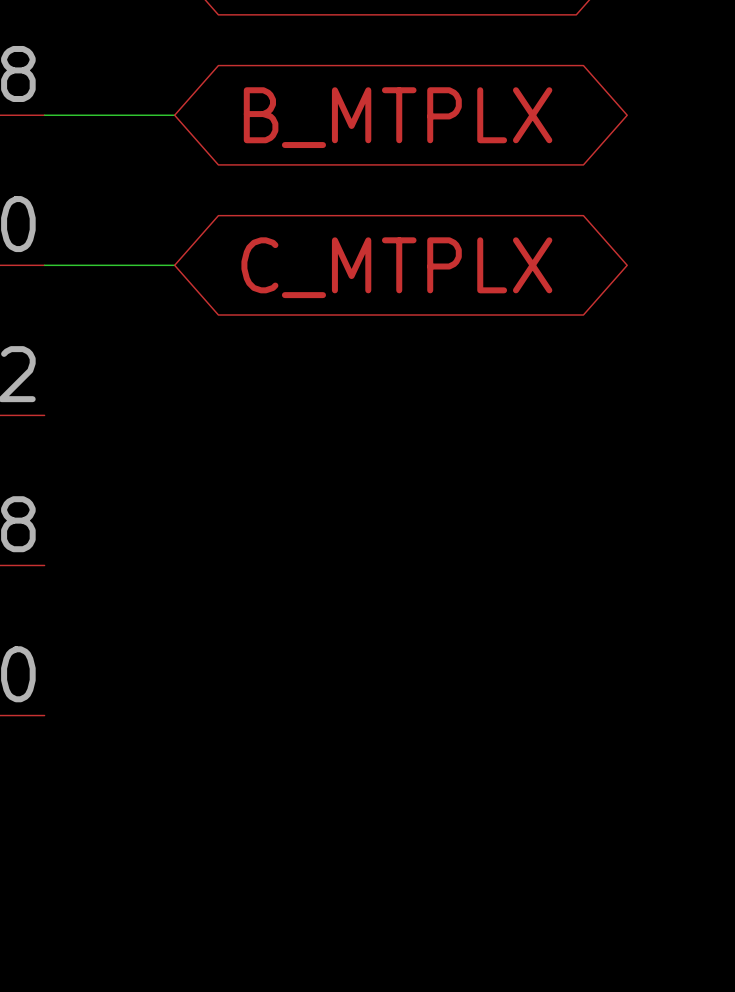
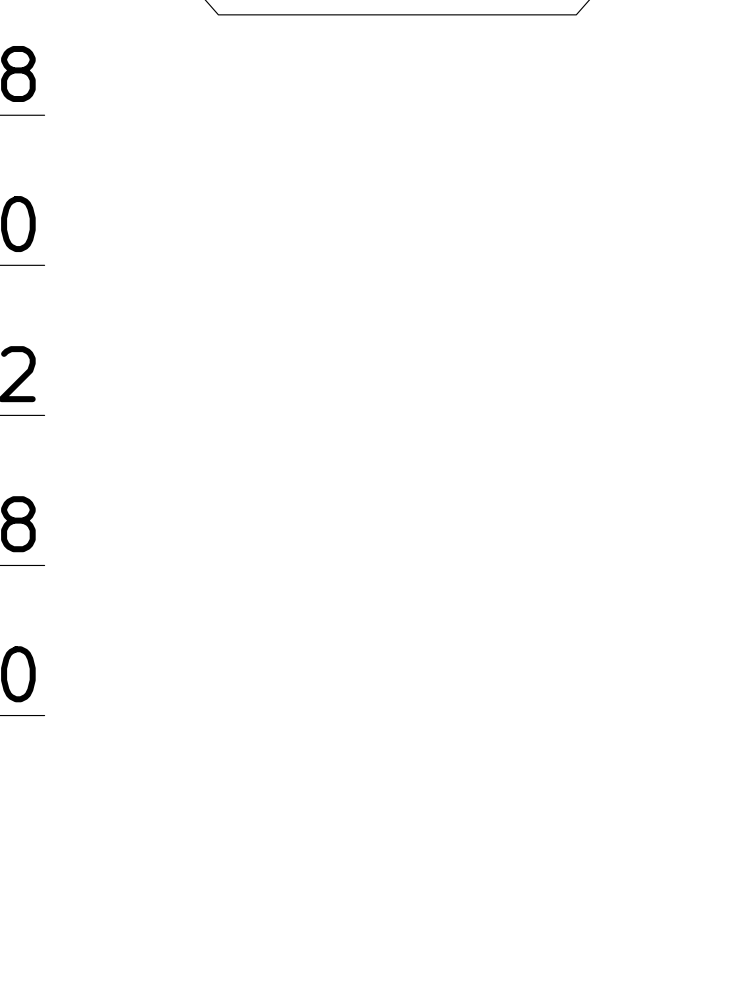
wire: (44, 115) (174, 115) -> none
global label: B_MTPLX (398, 117) -> none
wire: (44, 265) (174, 265) -> none
global label: C_MTPLX (396, 267) -> none

